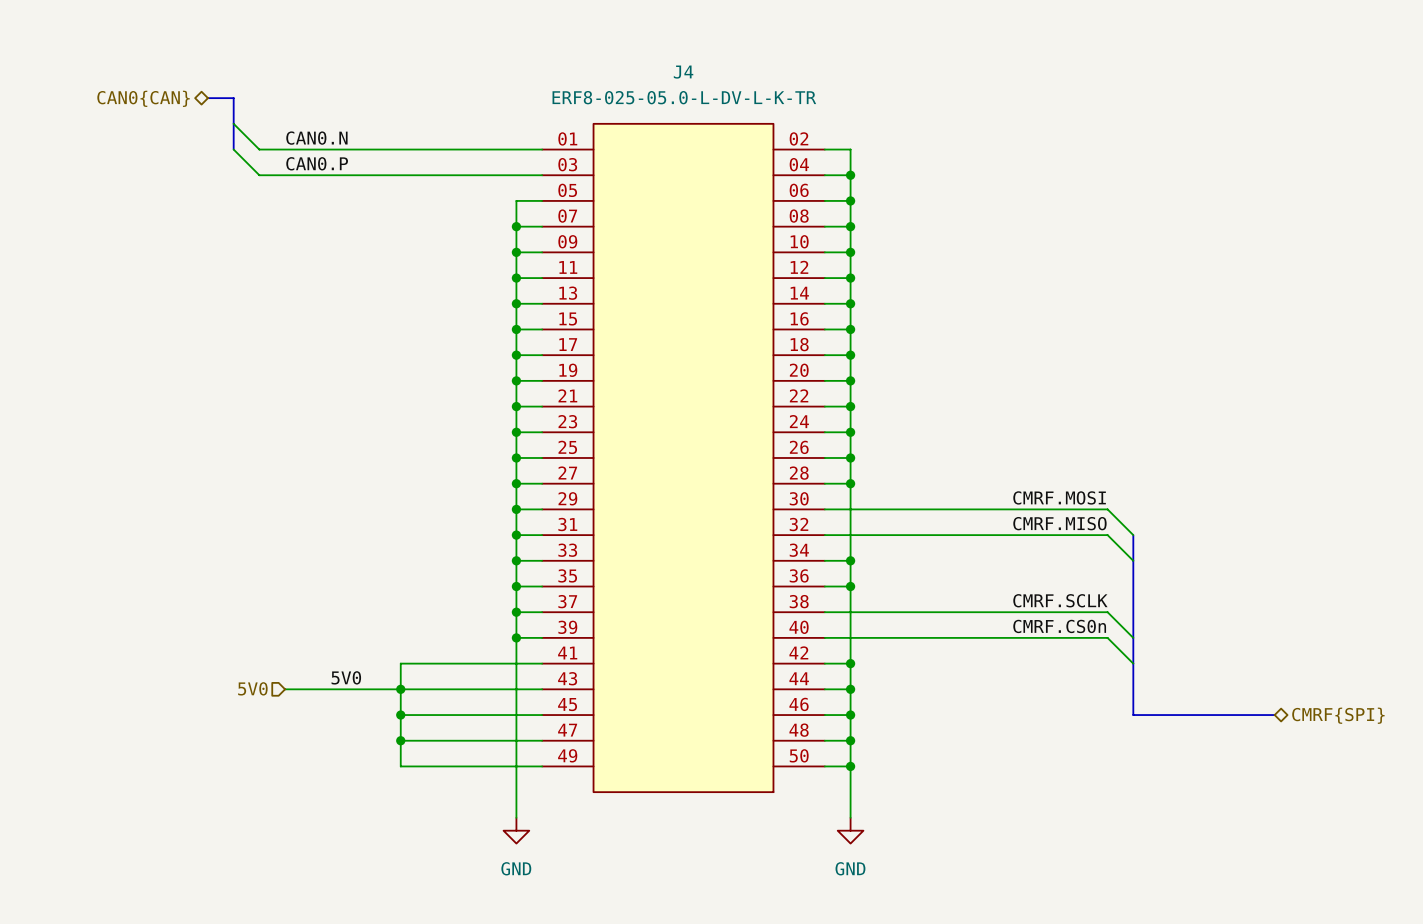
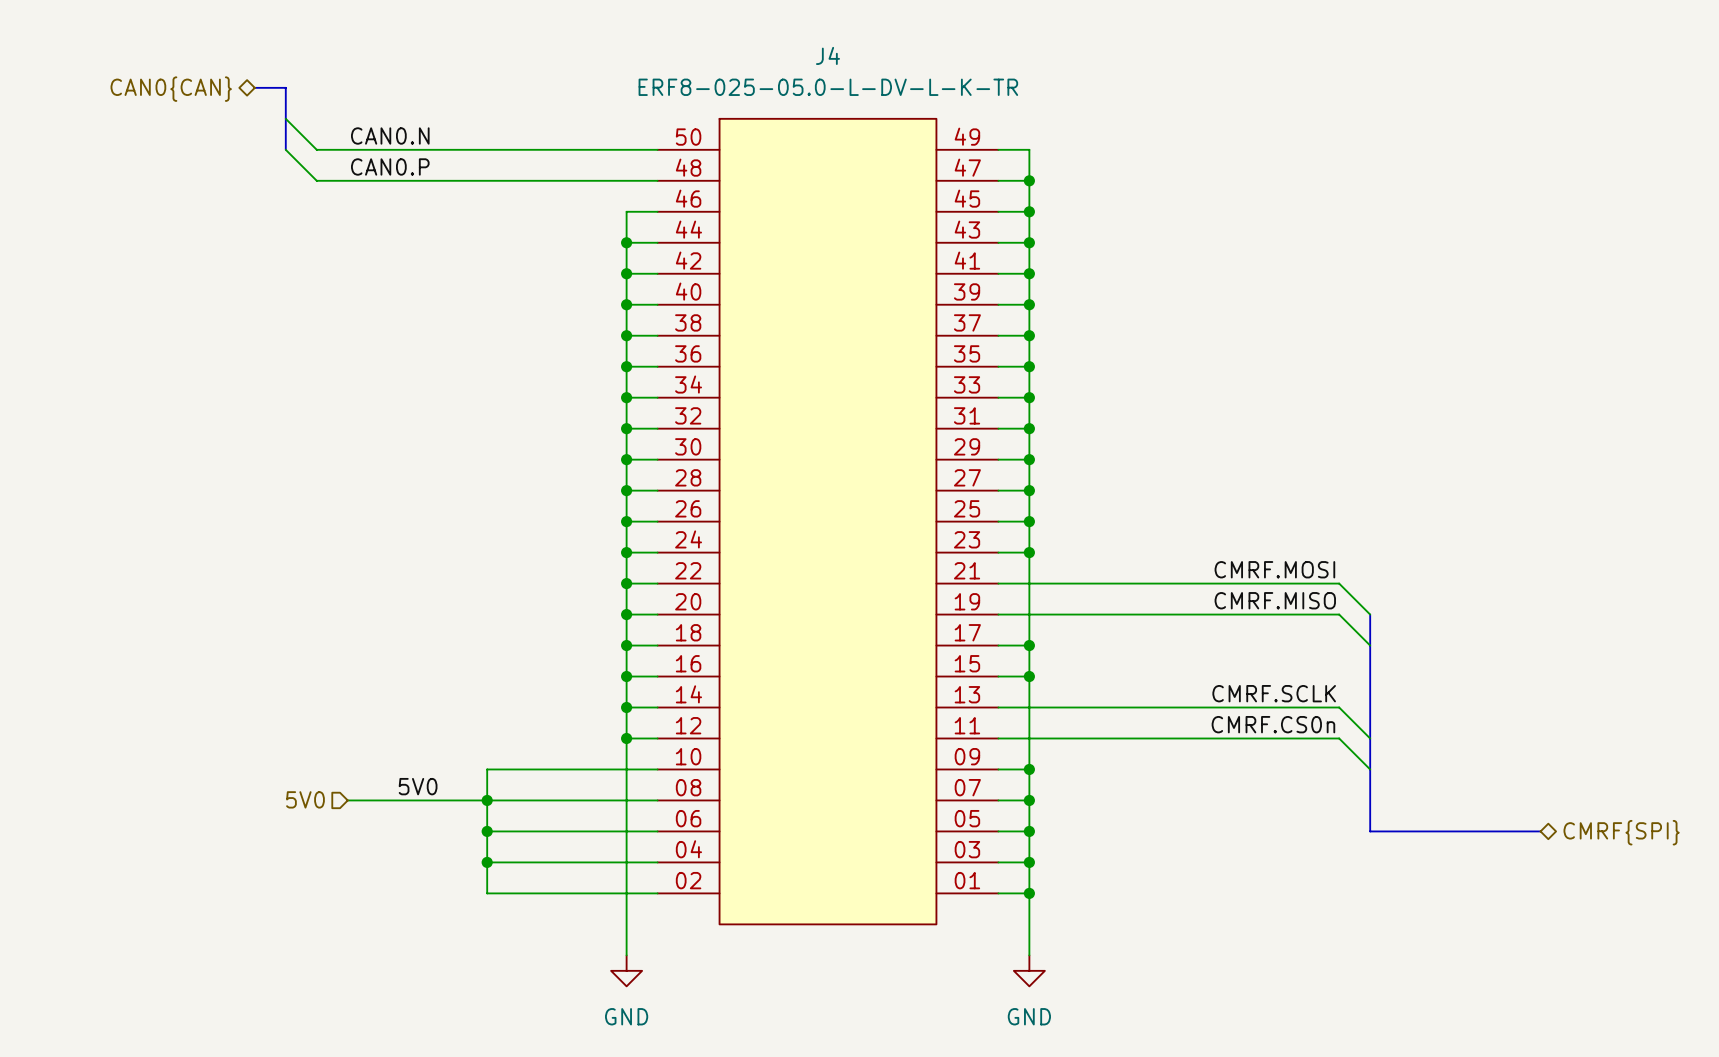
J4 rotation: 0° (683, 457) -> 180° (827, 521)

